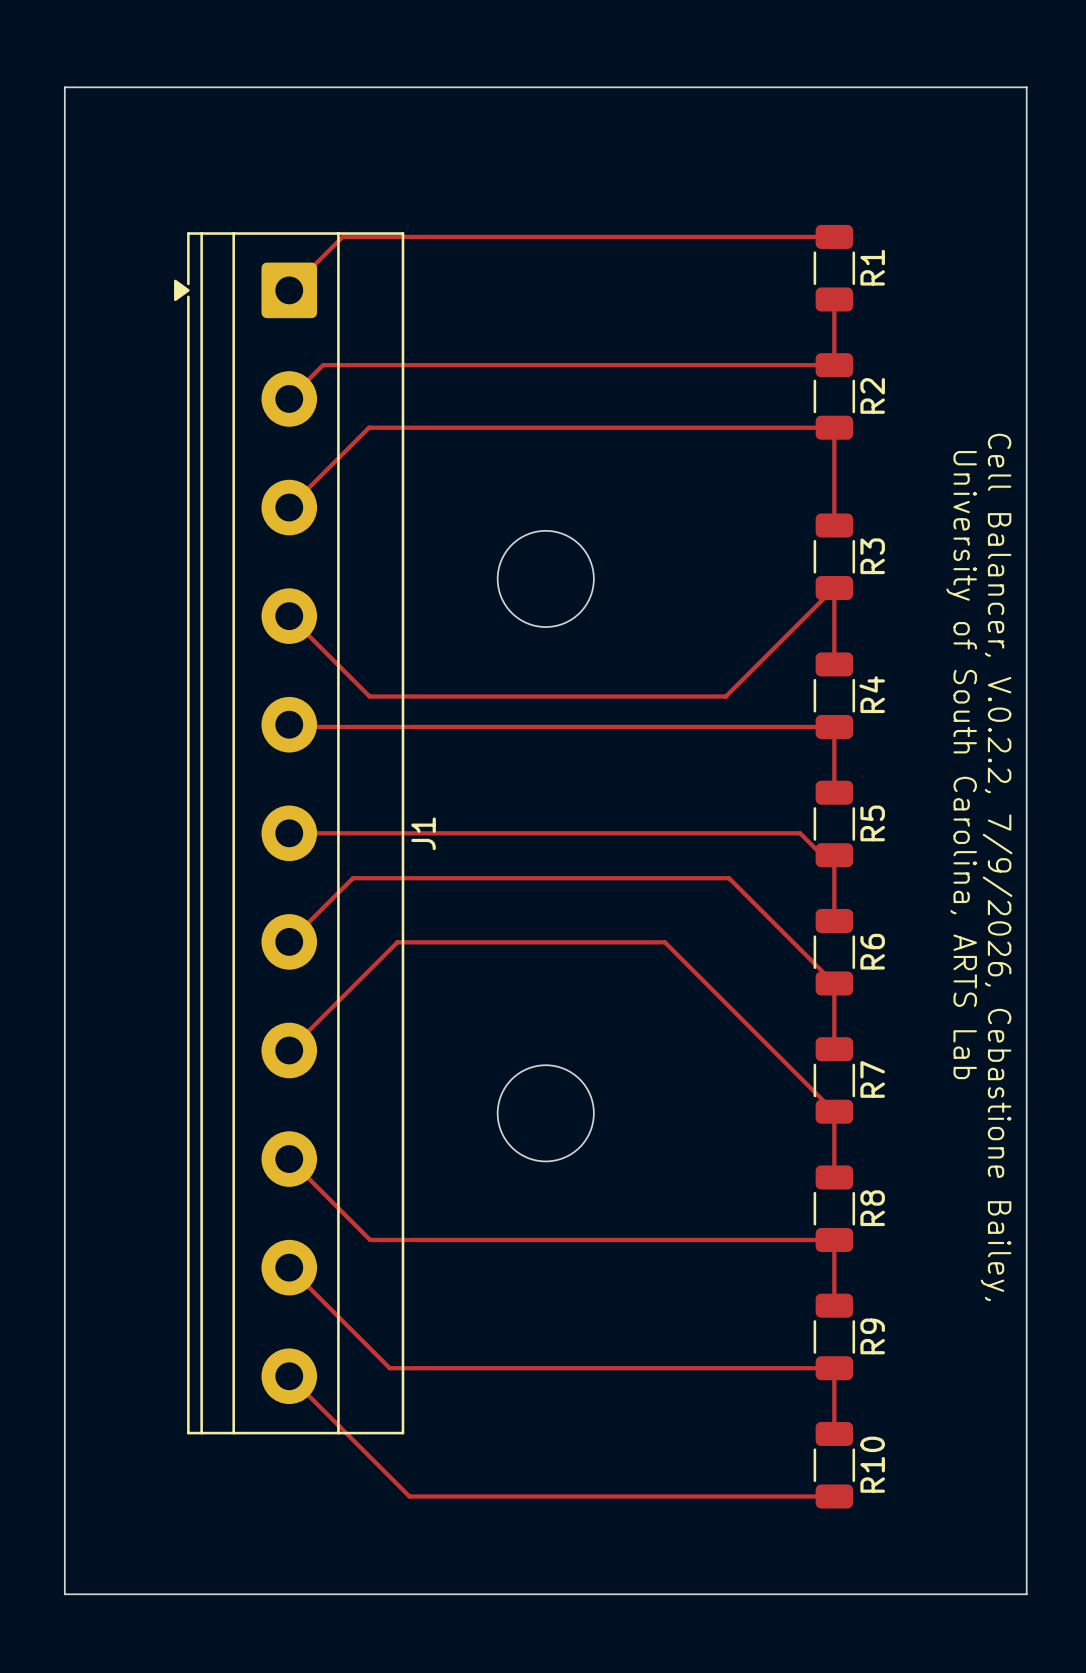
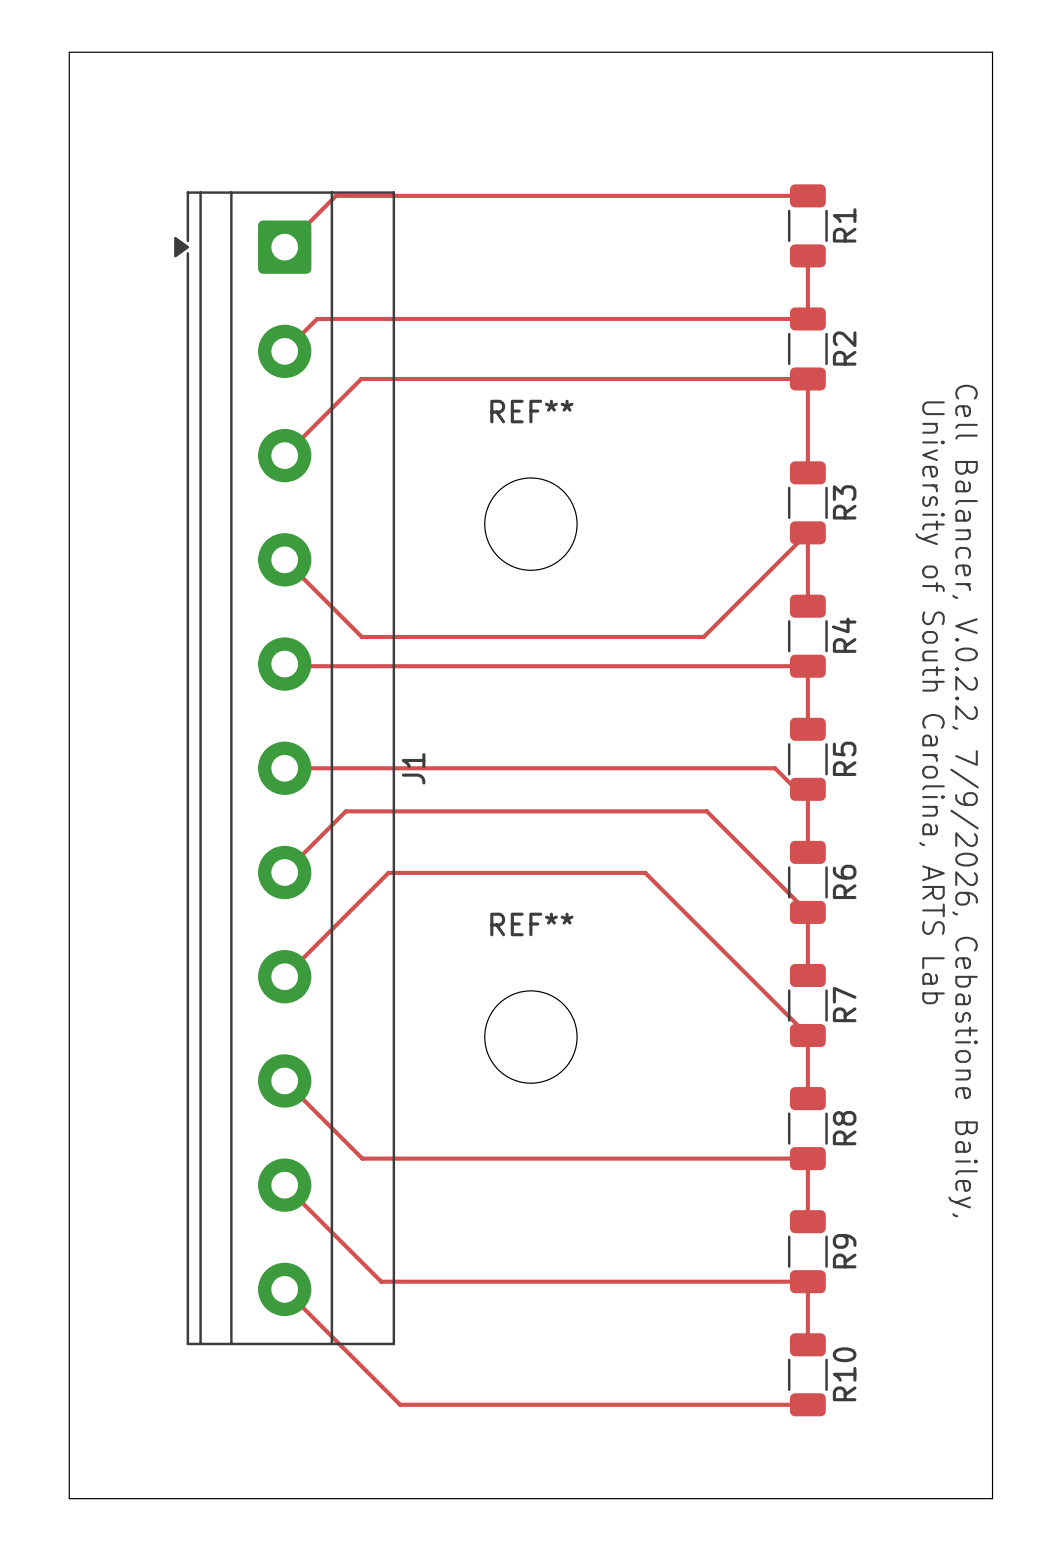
REF** name: none -> REF** (531, 411)
REF** name: none -> REF** (531, 924)

